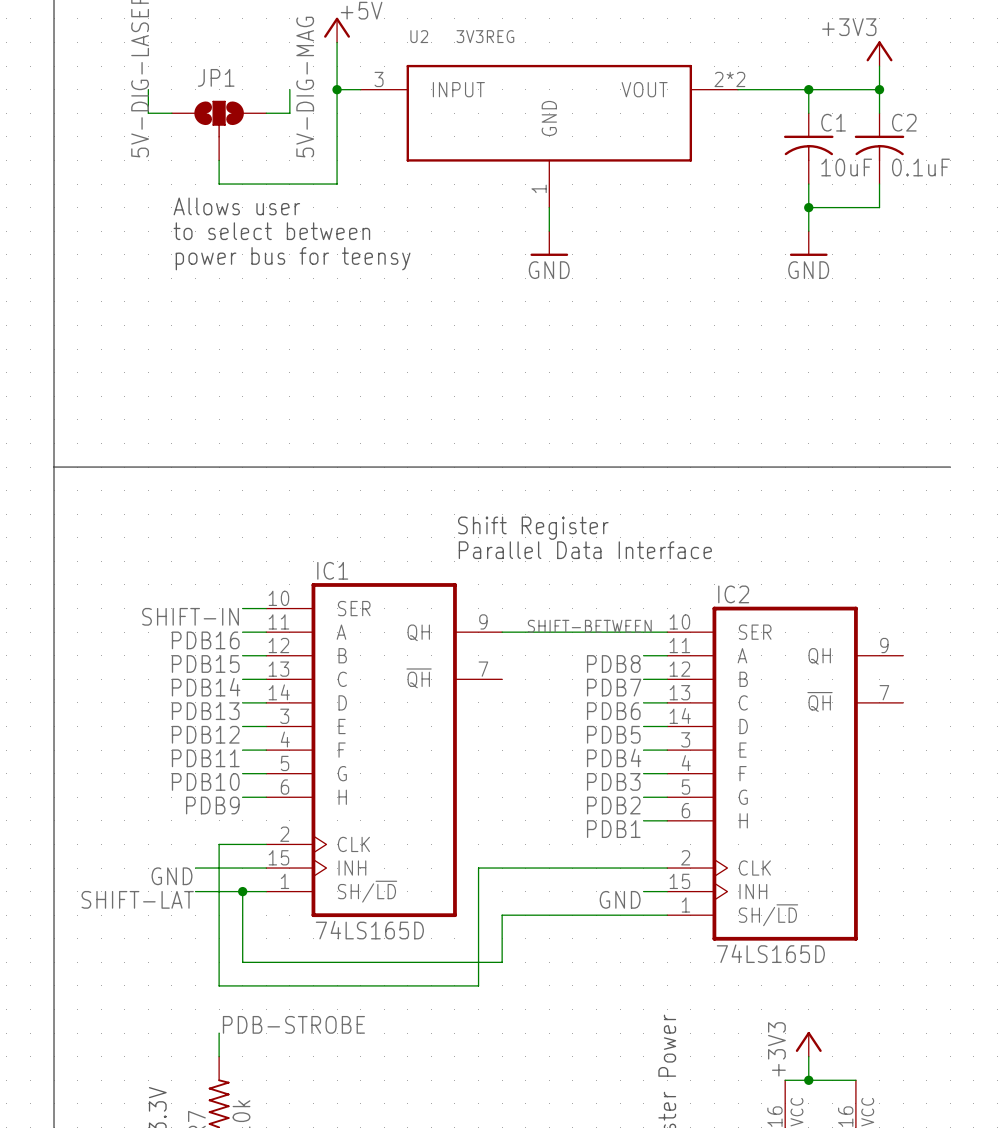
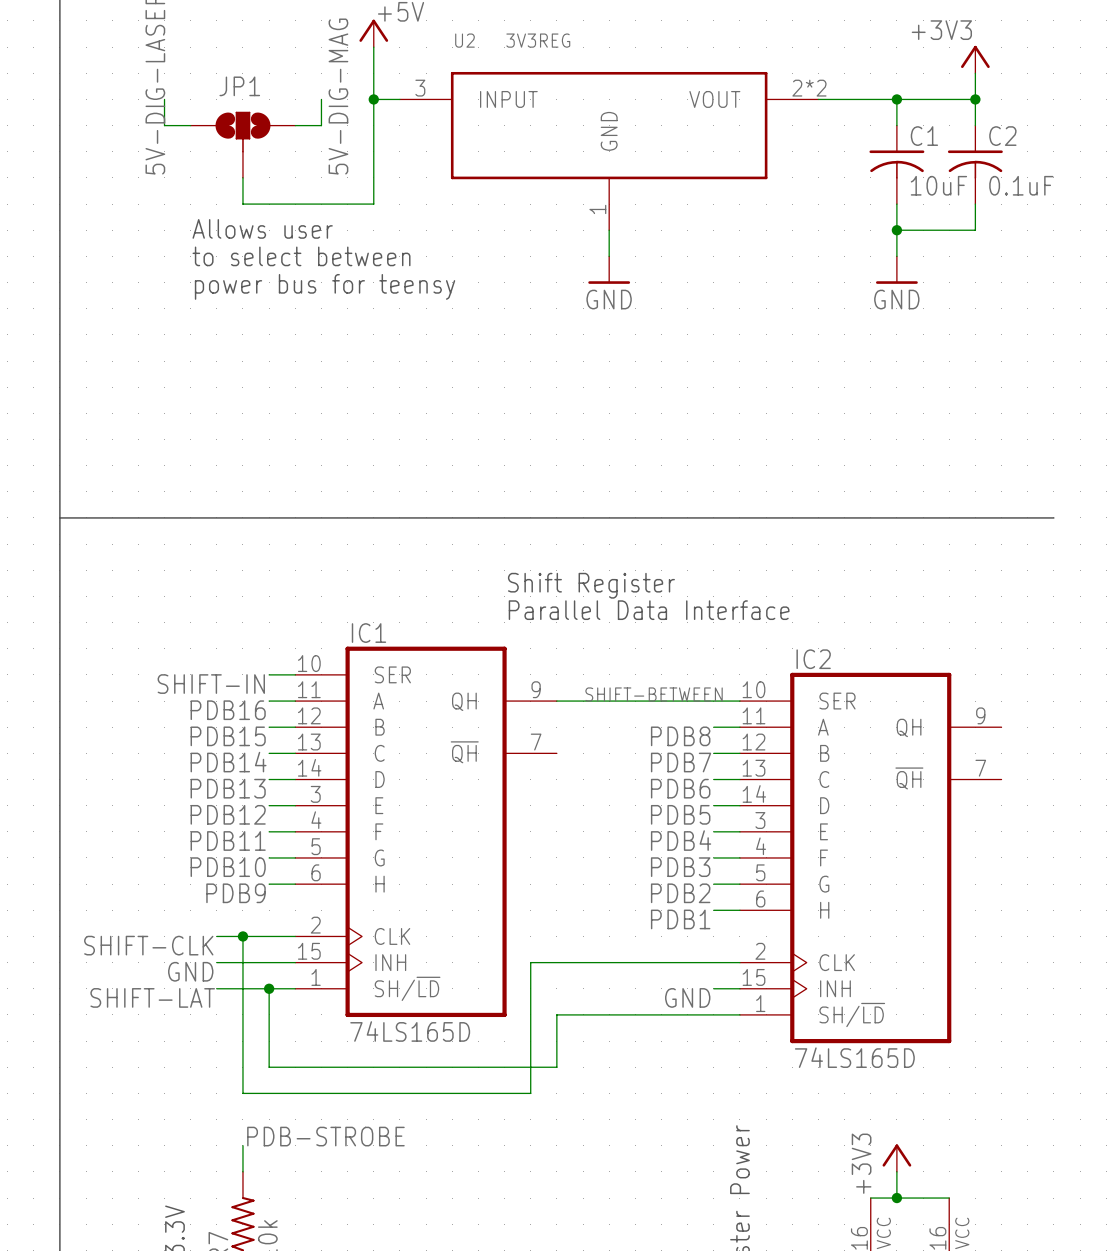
wire: none -> (216, 936) (242, 936)
junction: none -> (242, 936)
label: none -> SHIFT-CLK (148, 945)

